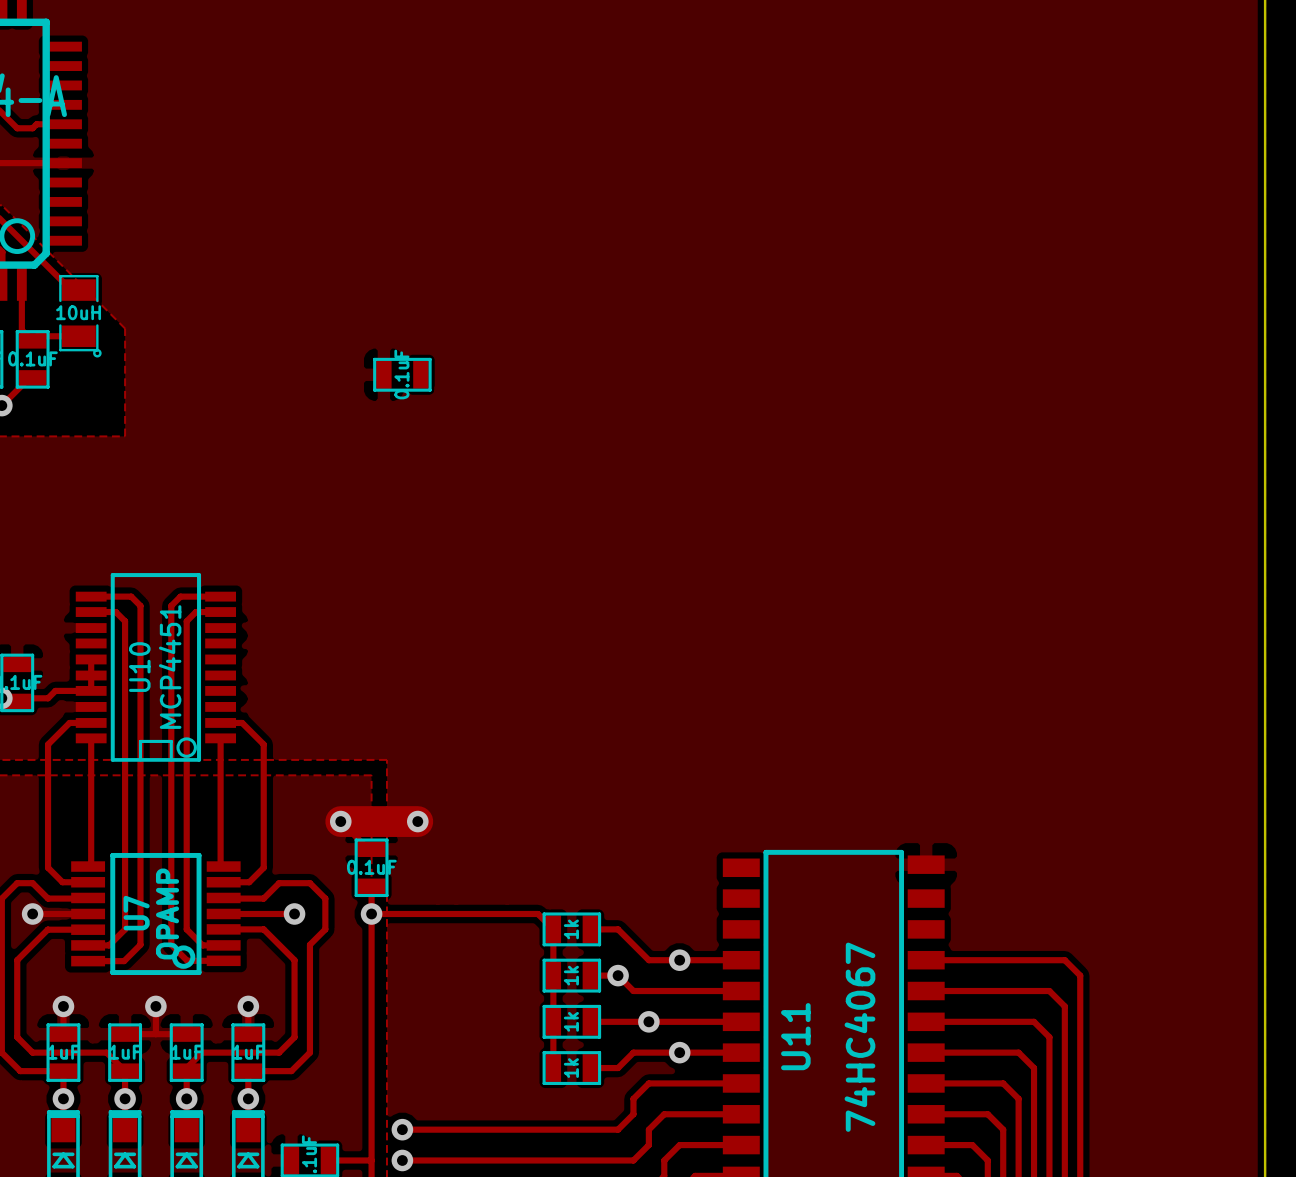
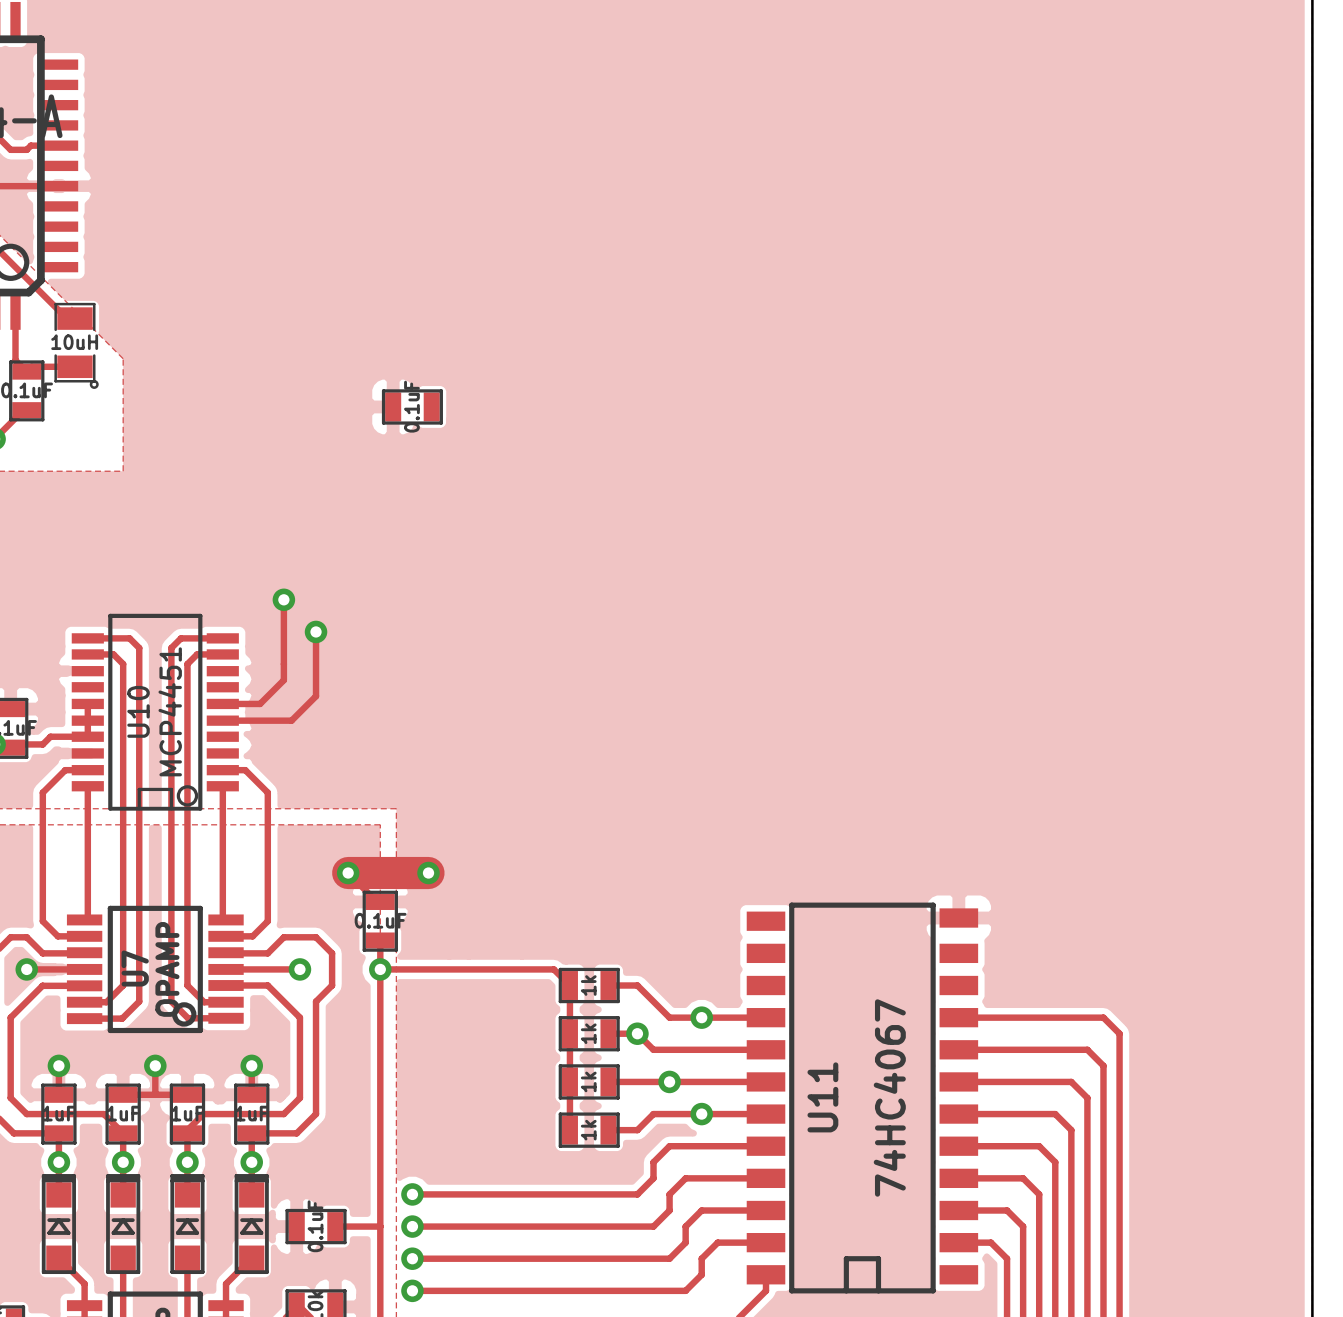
track: none -> (283, 599) (283, 680) (260, 703) (222, 703)
via: none -> (283, 599)
track: none -> (316, 631) (316, 696) (291, 720) (222, 720)
via: none -> (316, 631)

